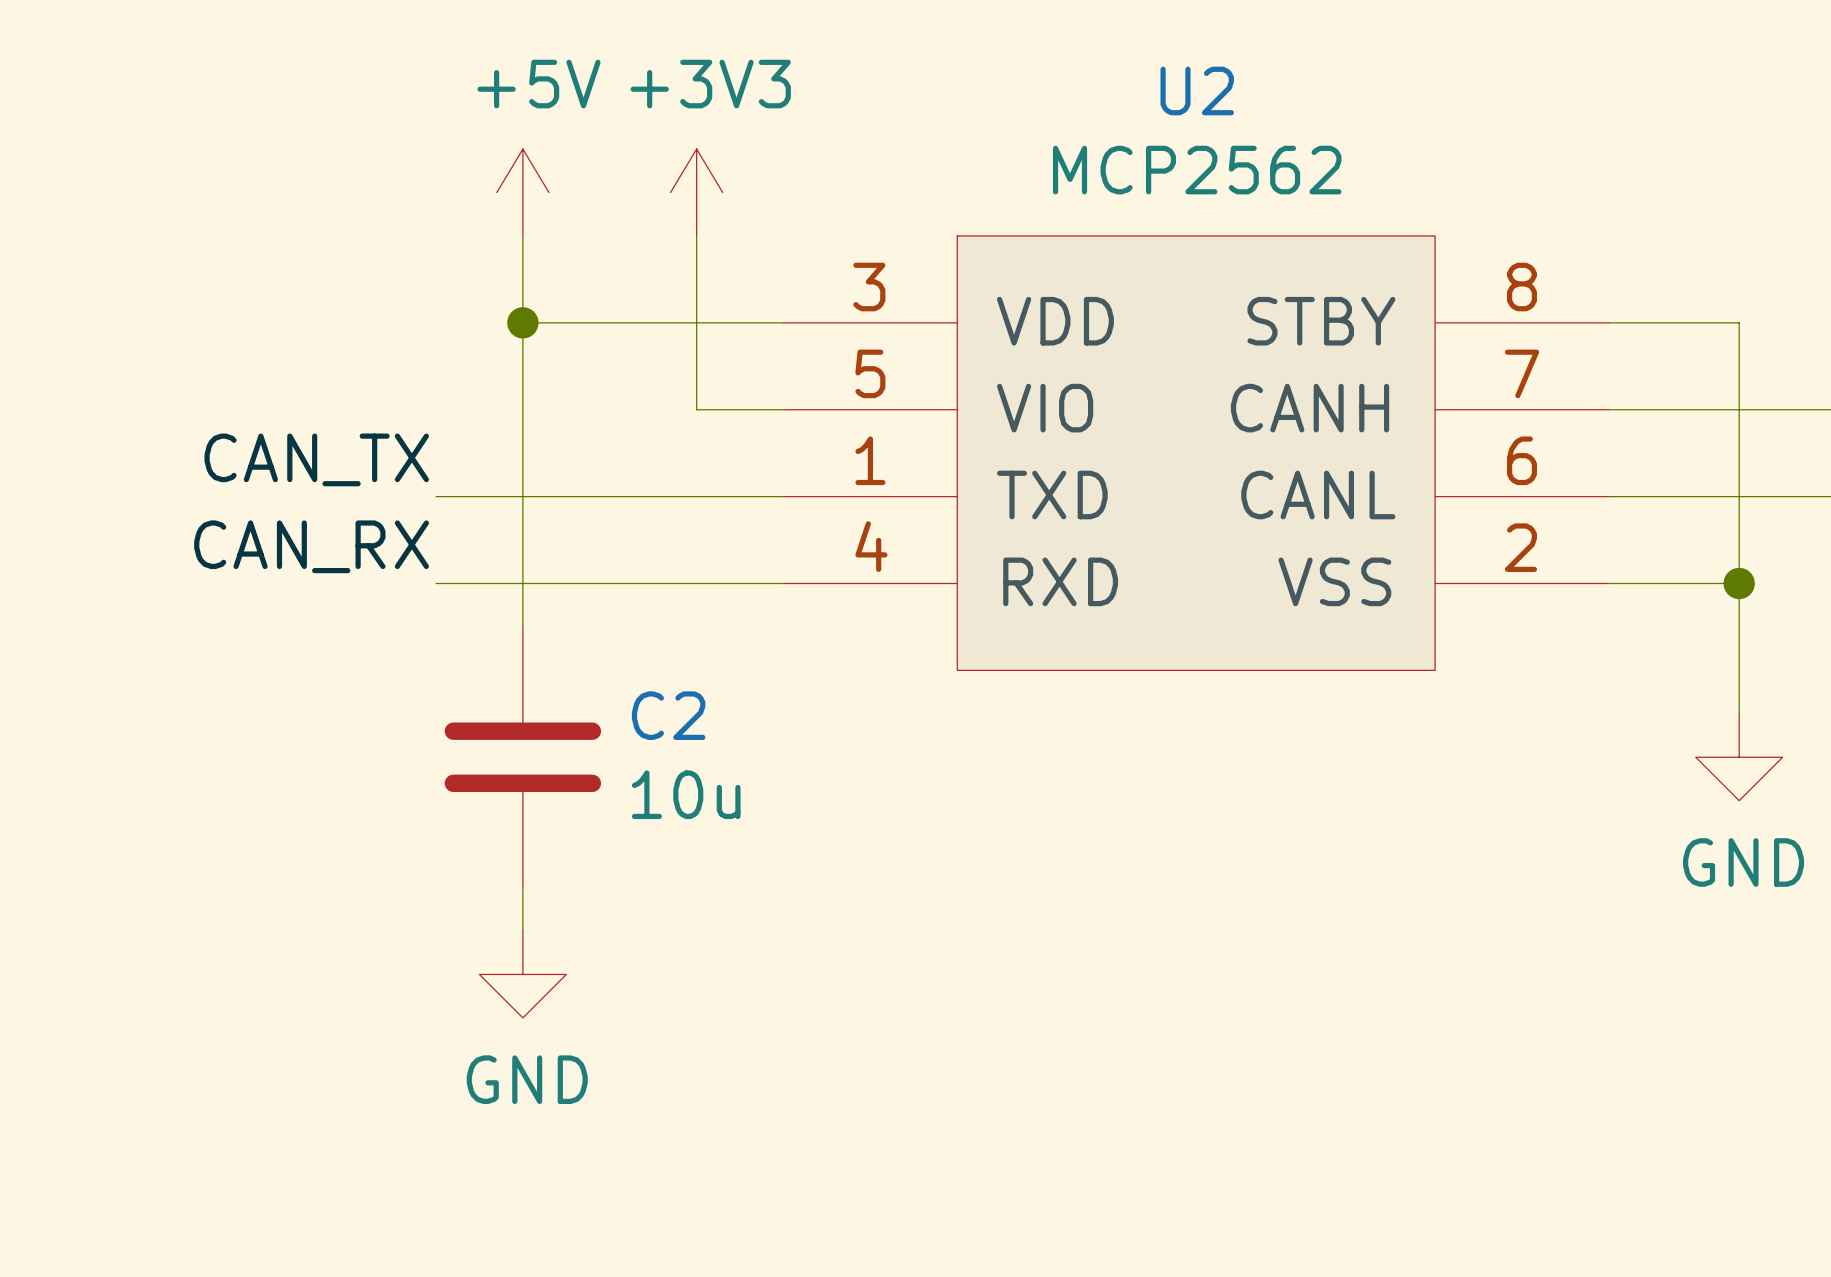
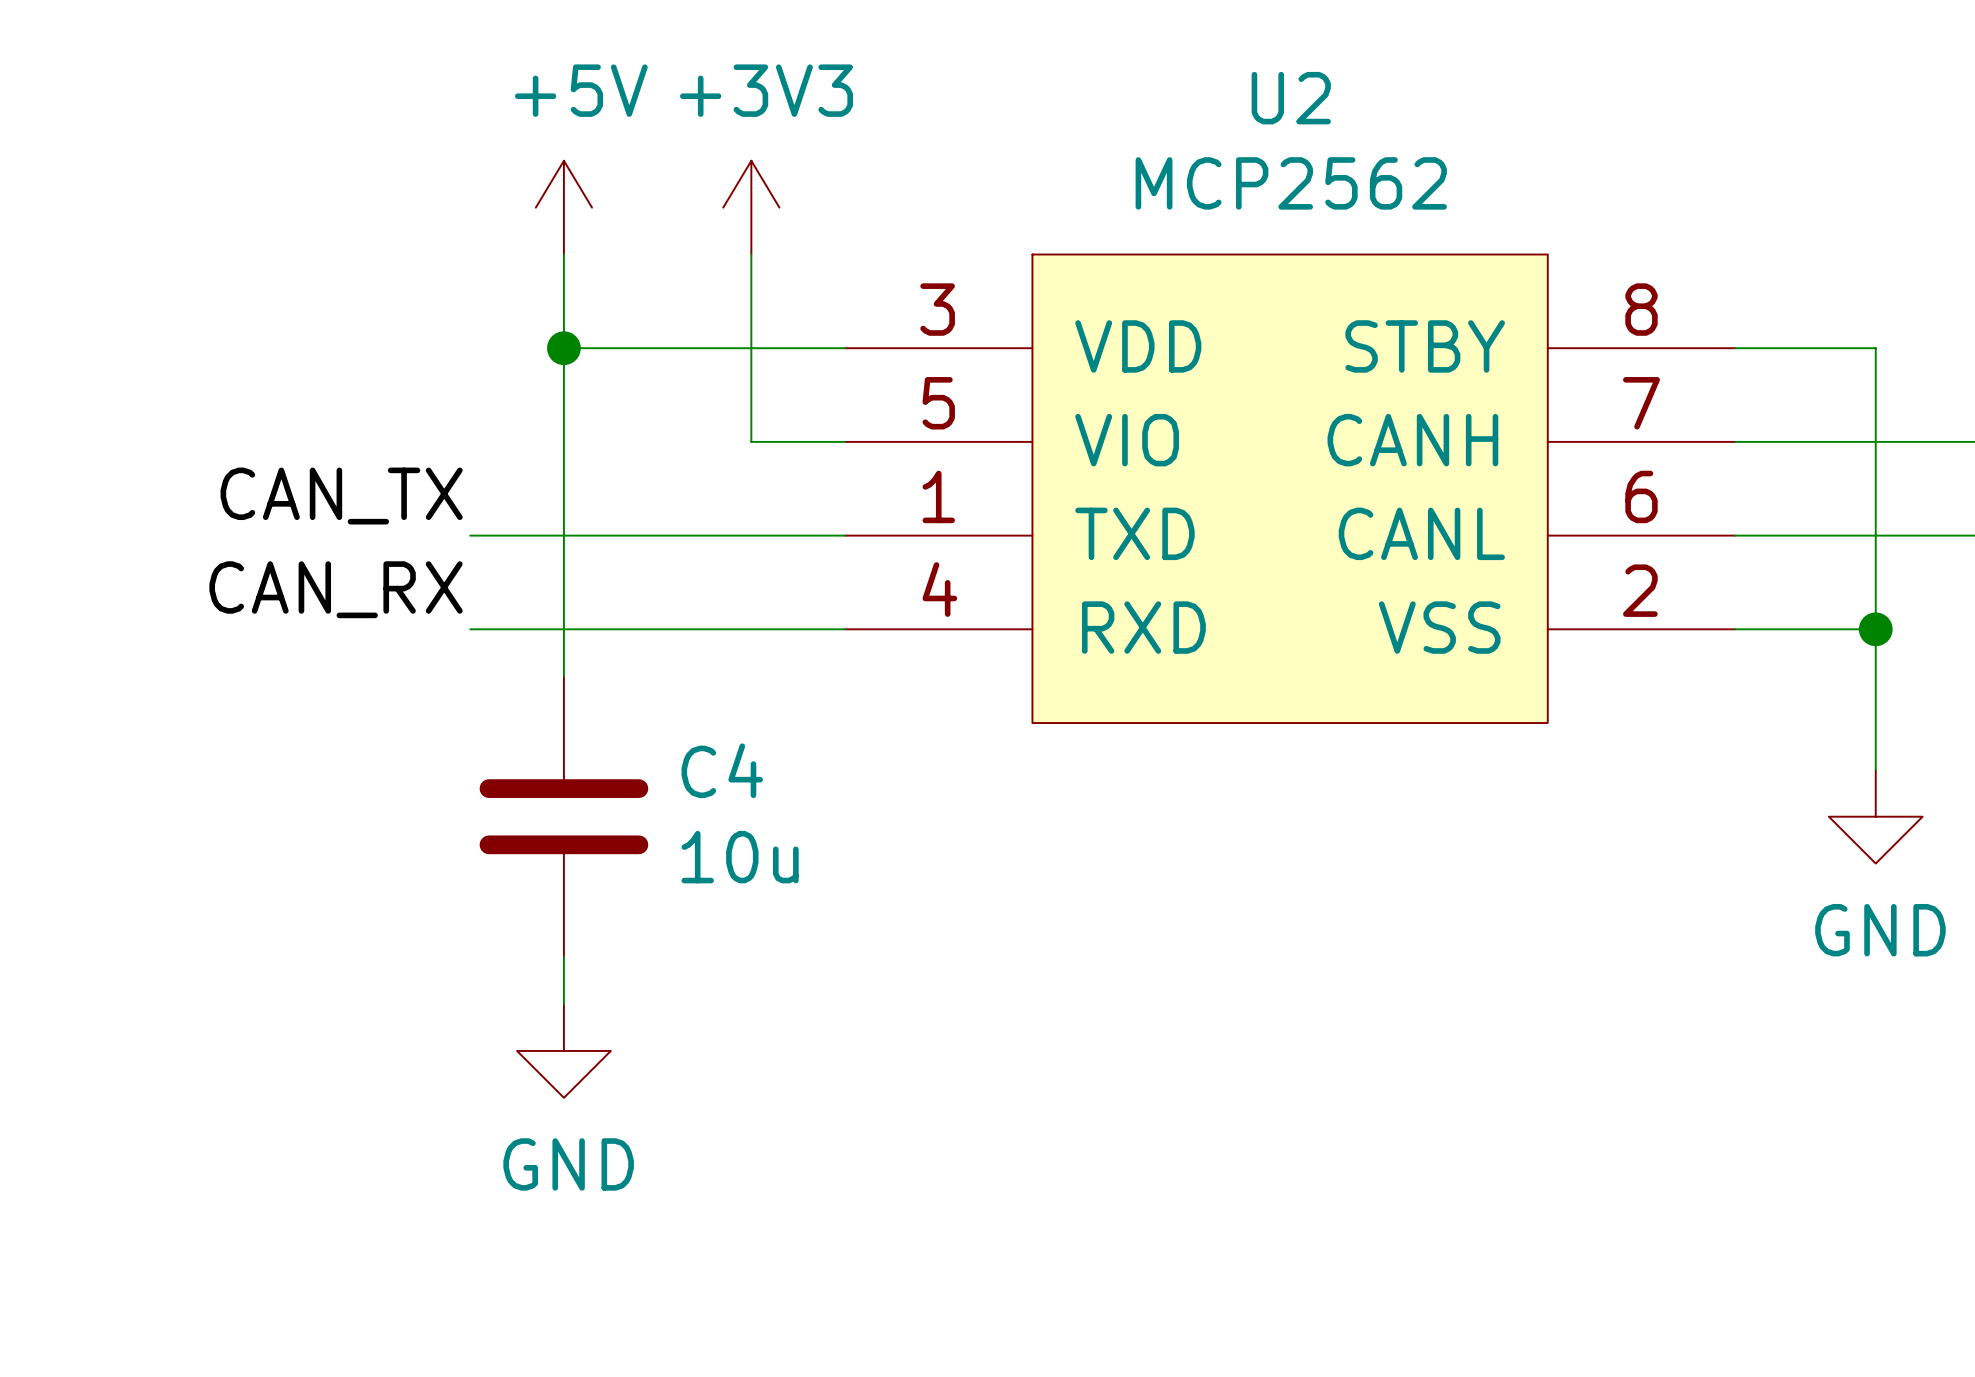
C2 name: C2 (668, 715) -> C4 (722, 770)

